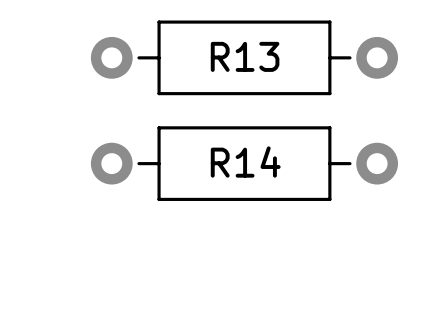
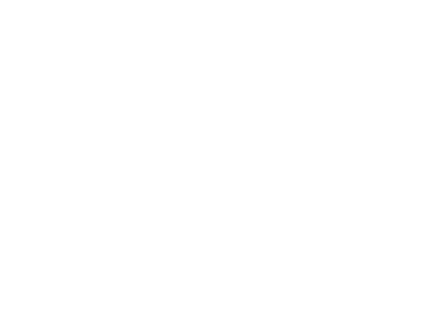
R13: (244, 57) -> none
R14: (244, 163) -> none

